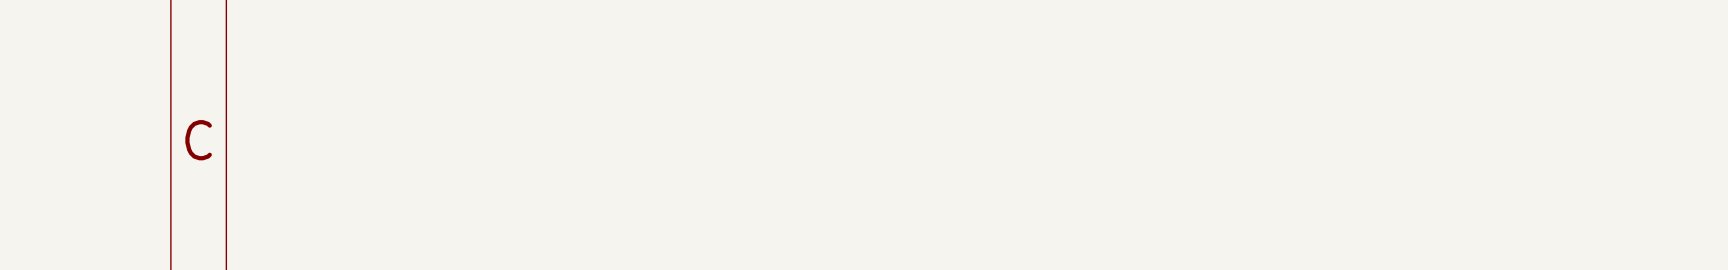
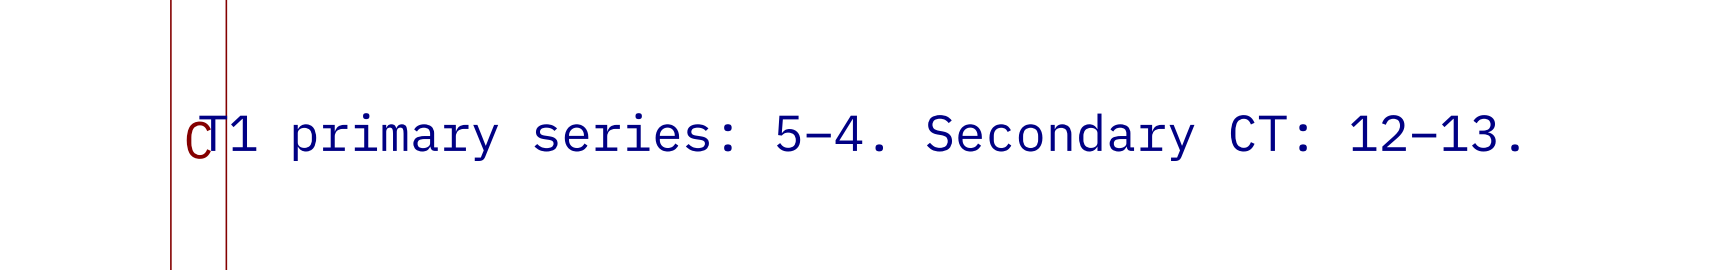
text: none -> T1 primary series: 5–4. Secondary CT: 12–13. (859, 137)

